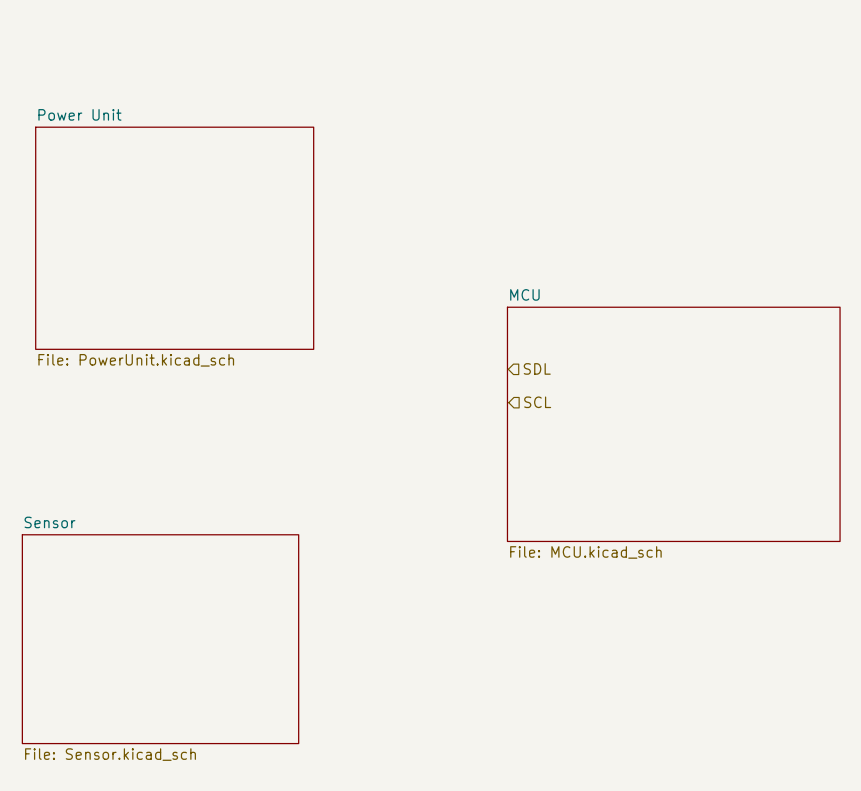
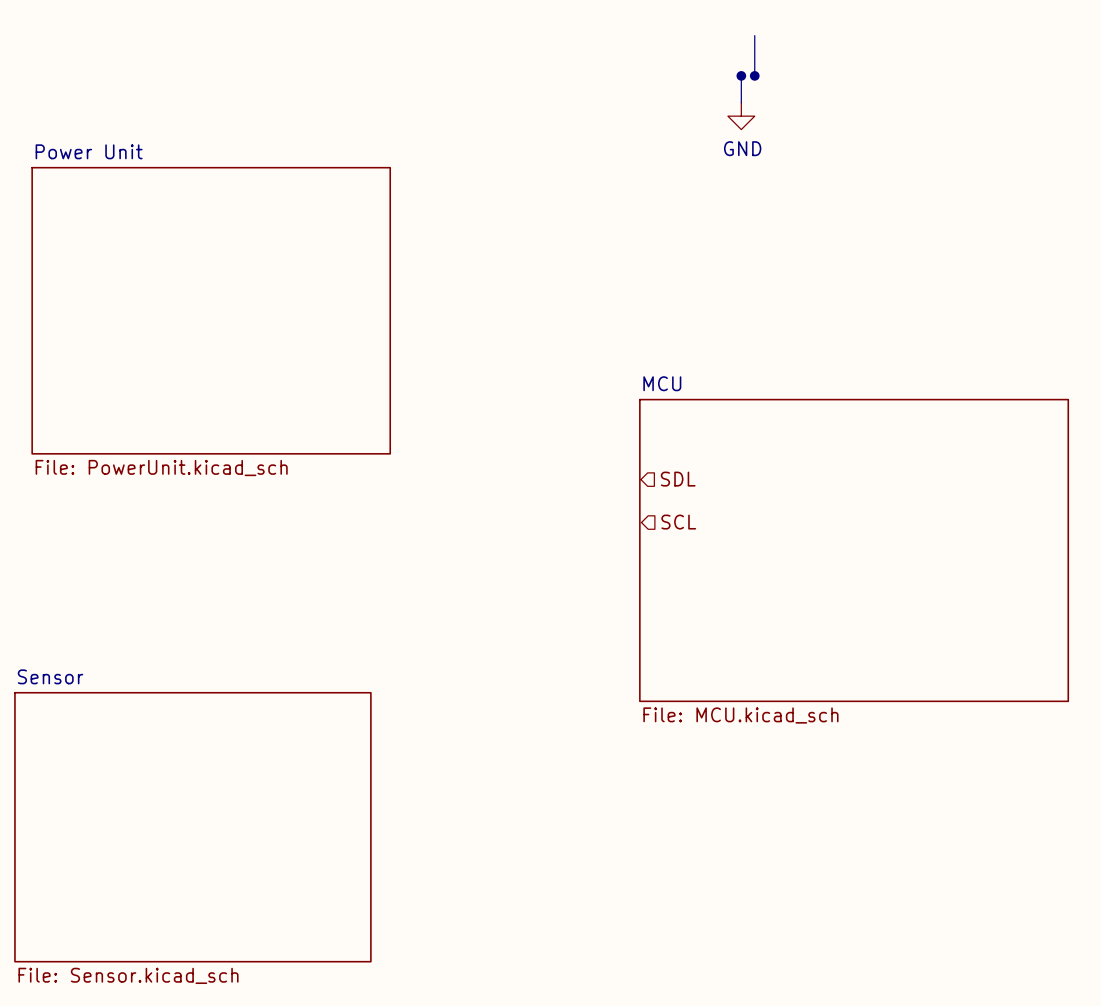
wire: none -> (754, 35) (754, 75)
wire: none -> (741, 75) (741, 102)
junction: none -> (741, 75)
junction: none -> (754, 75)
power symbol: none -> GND (741, 116)

